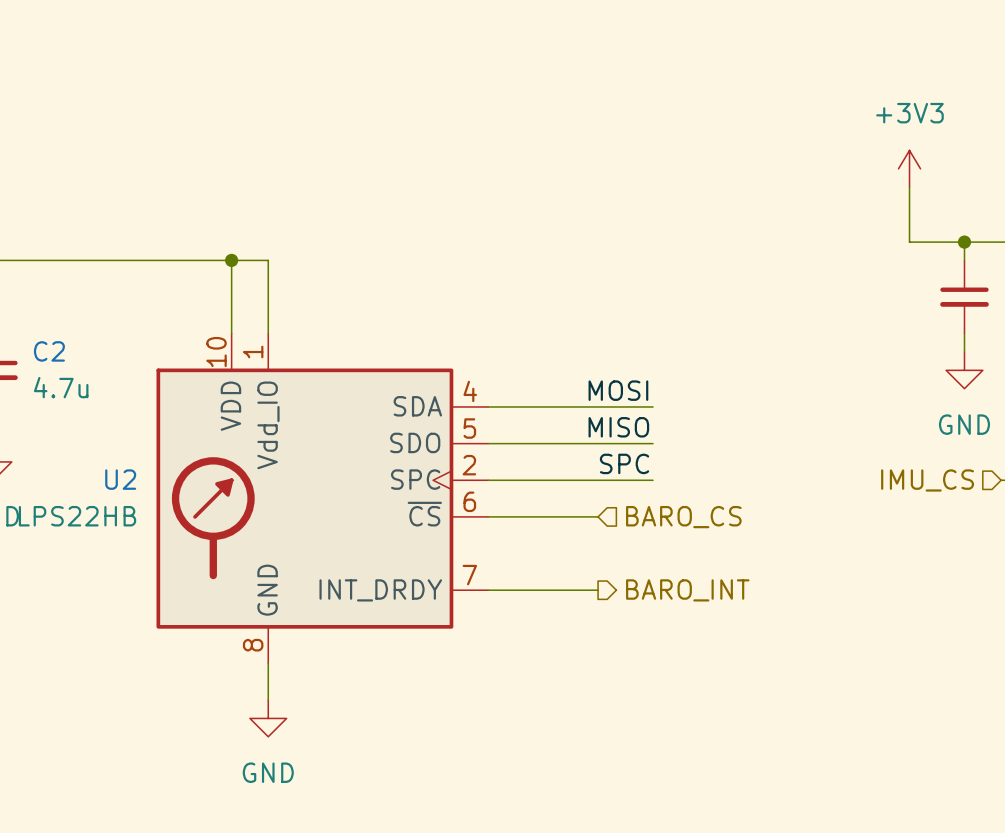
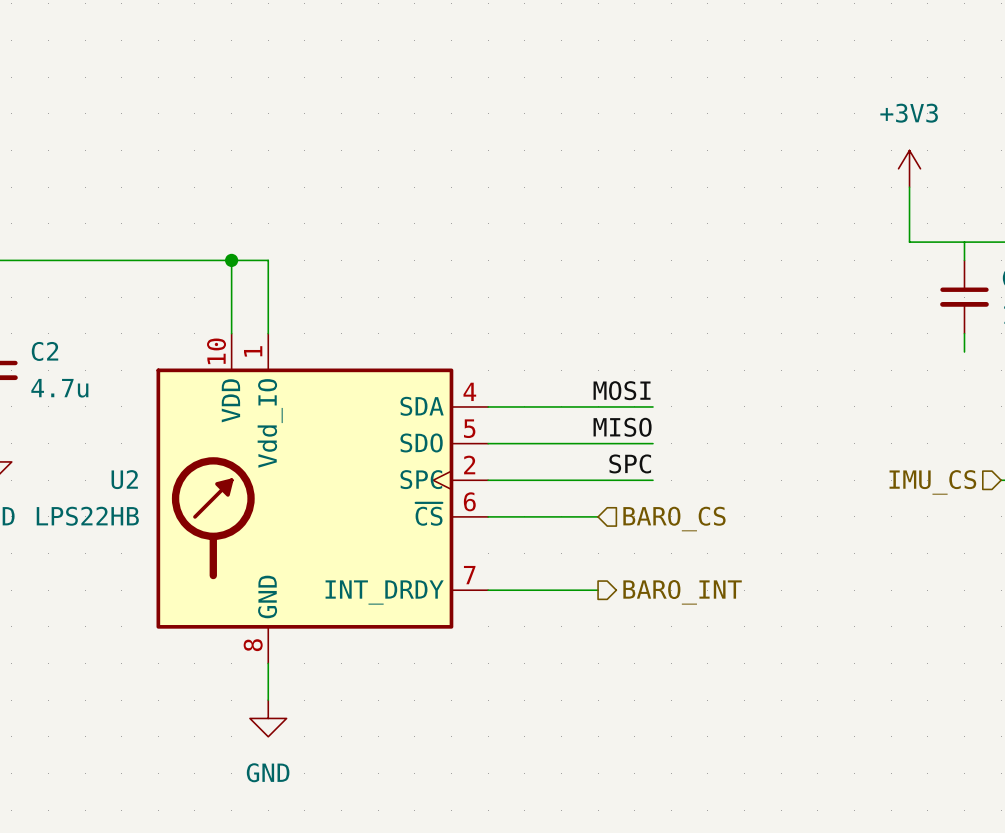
junction: (964, 242) -> none
power symbol: GND (964, 370) -> none

